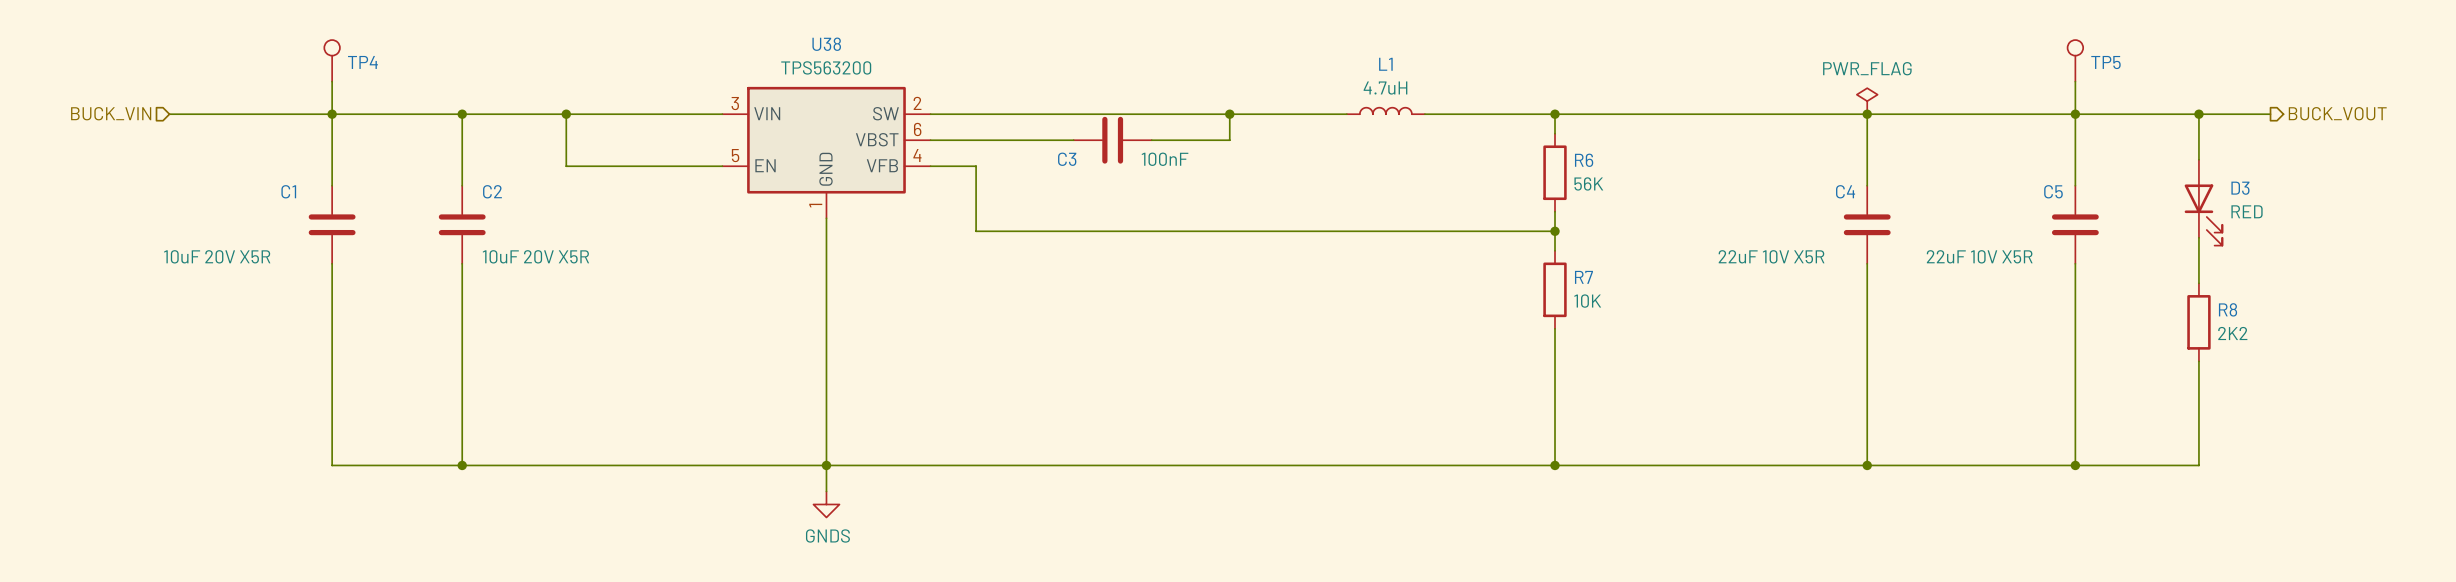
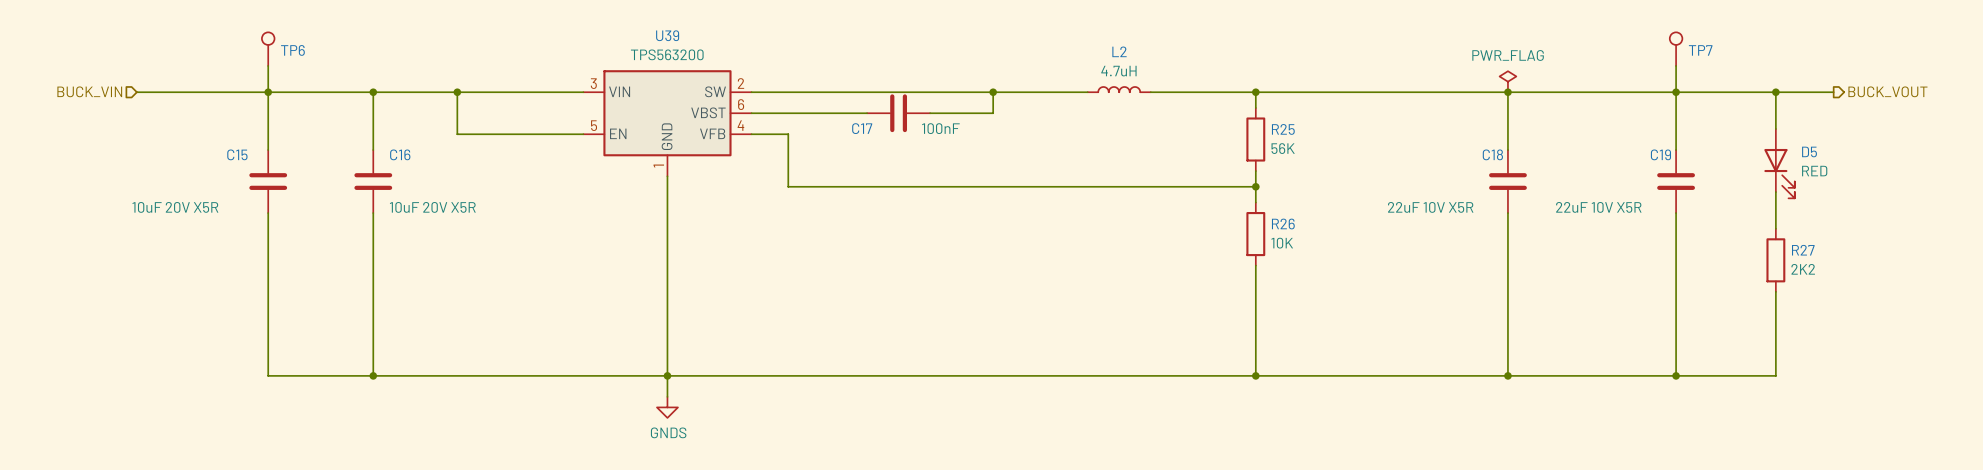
U38 name: U38 (826, 44) -> U39 (667, 35)
TP4 name: TP4 (362, 62) -> TP6 (292, 50)
TP5 name: TP5 (2105, 62) -> TP7 (1700, 50)
L1 name: L1 (1385, 64) -> L2 (1119, 51)
C3 name: C3 (1067, 159) -> C17 (862, 128)
R6 name: R6 (1584, 160) -> R25 (1283, 129)
D3 name: D3 (2240, 188) -> D5 (1809, 151)
C1 name: C1 (288, 191) -> C15 (237, 154)
C2 name: C2 (492, 191) -> C16 (400, 154)
C4 name: C4 (1845, 191) -> C18 (1492, 154)
C5 name: C5 (2053, 191) -> C19 (1660, 154)
R7 name: R7 (1583, 277) -> R26 (1283, 224)
R8 name: R8 (2228, 309) -> R27 (1803, 250)

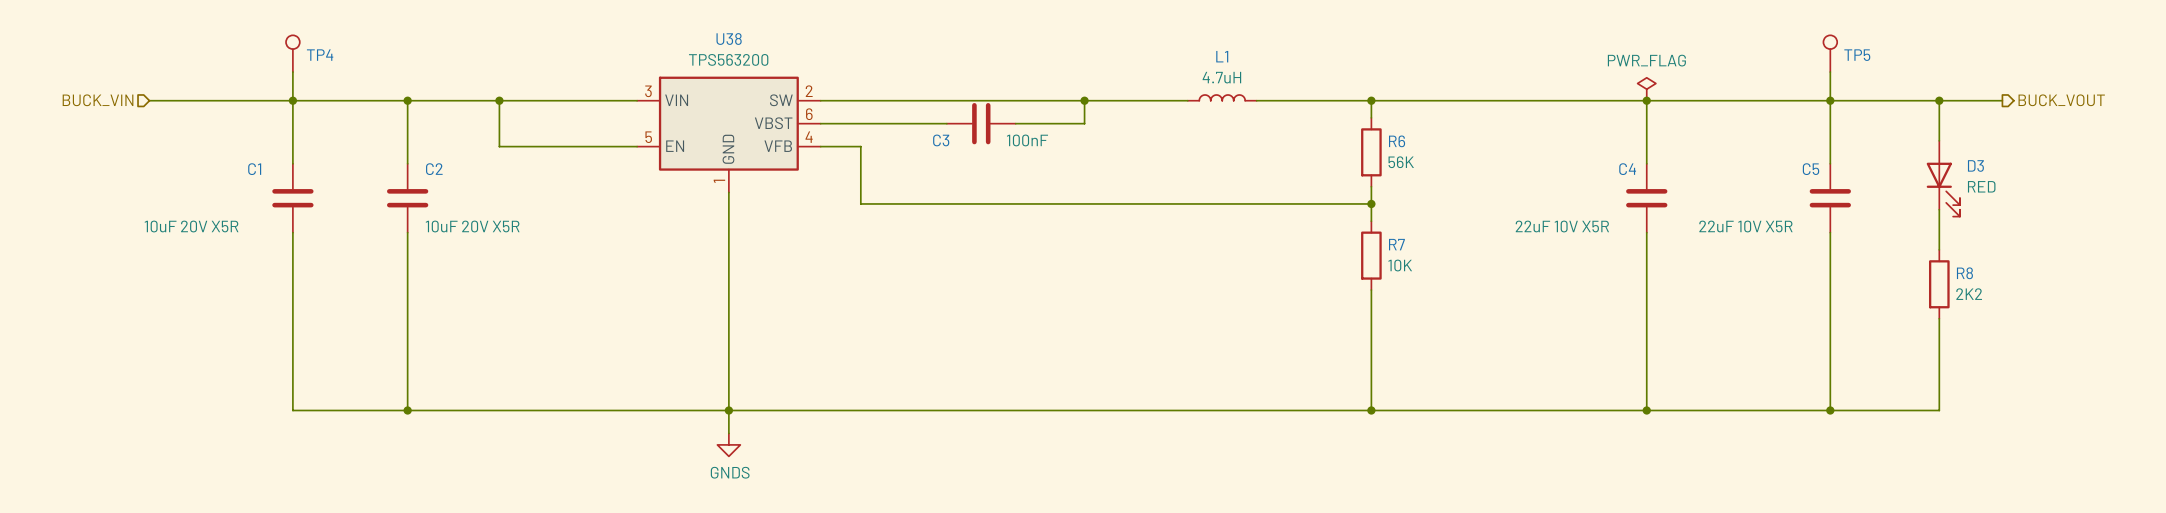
U39 name: U39 (667, 35) -> U38 (729, 39)
TP6 name: TP6 (292, 50) -> TP4 (320, 55)
TP7 name: TP7 (1700, 50) -> TP5 (1857, 55)
L2 name: L2 (1119, 51) -> L1 (1222, 56)
C17 name: C17 (862, 128) -> C3 (941, 140)
R25 name: R25 (1283, 129) -> R6 (1397, 141)
D5 name: D5 (1809, 151) -> D3 (1975, 165)
C15 name: C15 (237, 154) -> C1 (254, 169)
C16 name: C16 (400, 154) -> C2 (434, 169)
C18 name: C18 (1492, 154) -> C4 (1627, 169)
C19 name: C19 (1660, 154) -> C5 (1811, 169)
R26 name: R26 (1283, 224) -> R7 (1396, 244)
R27 name: R27 (1803, 250) -> R8 (1964, 273)

